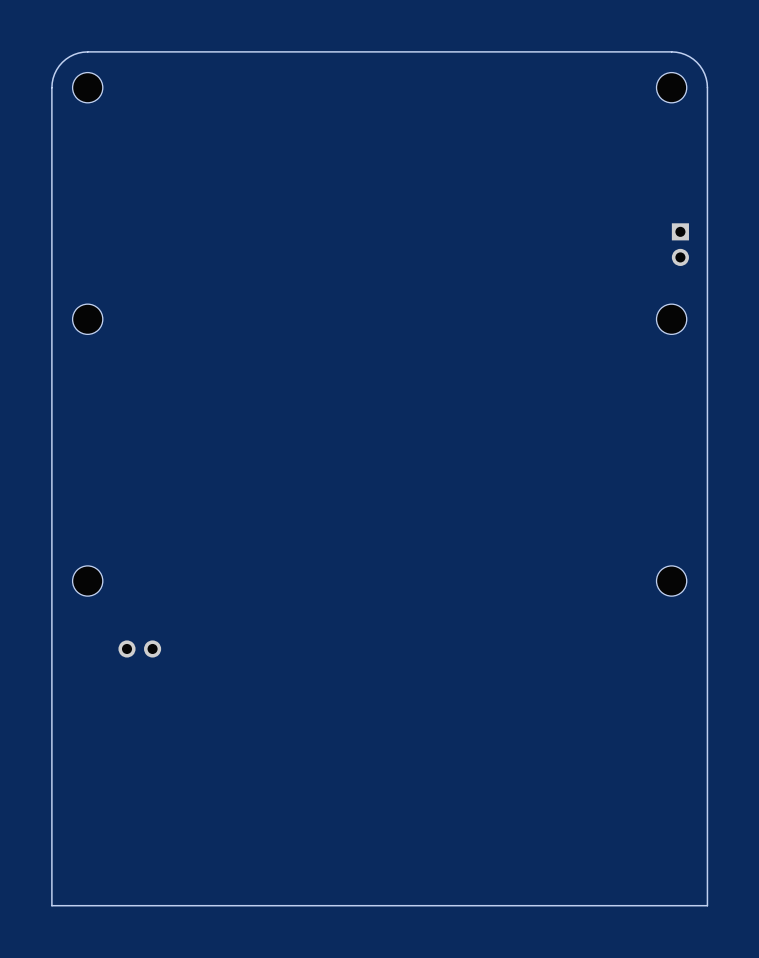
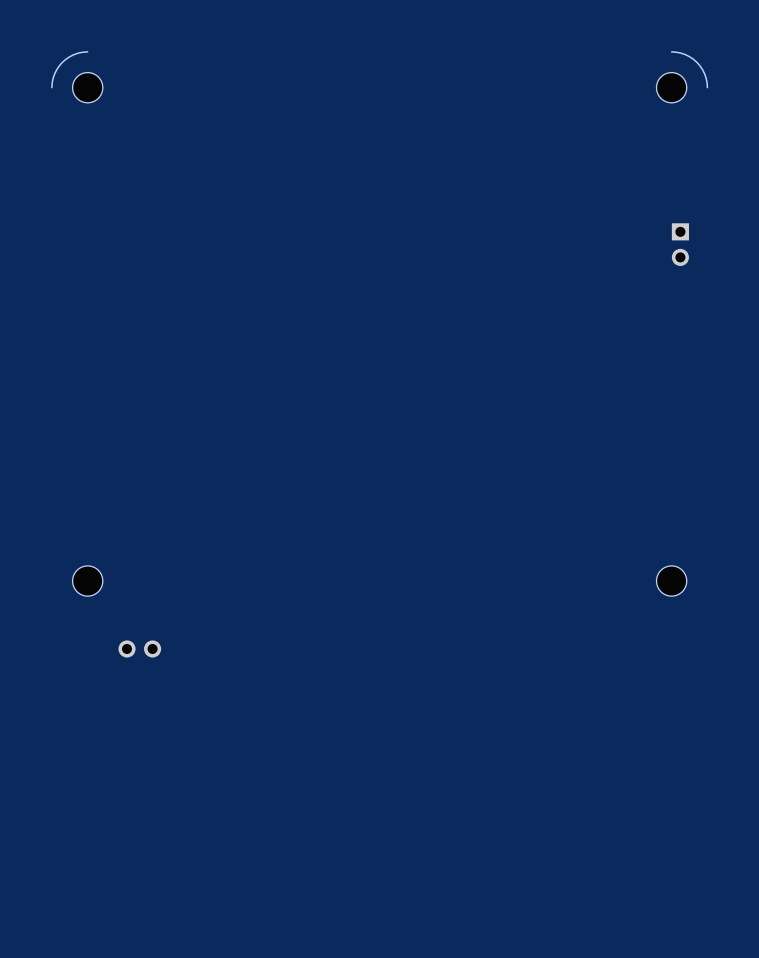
board edge: (671, 51) (87, 51) -> none
board edge: (707, 87) (707, 905) (51, 905) (51, 87) -> none
part: (87, 319) -> none
part: (671, 319) -> none

